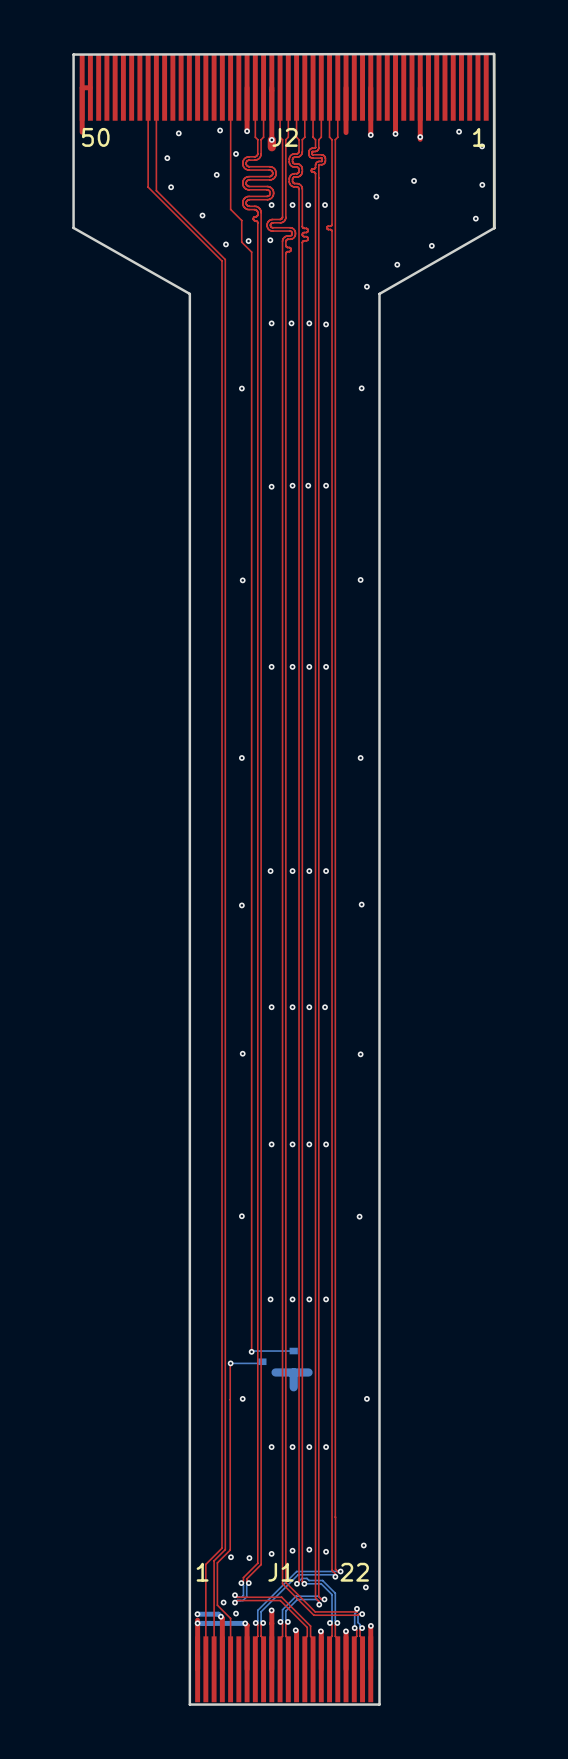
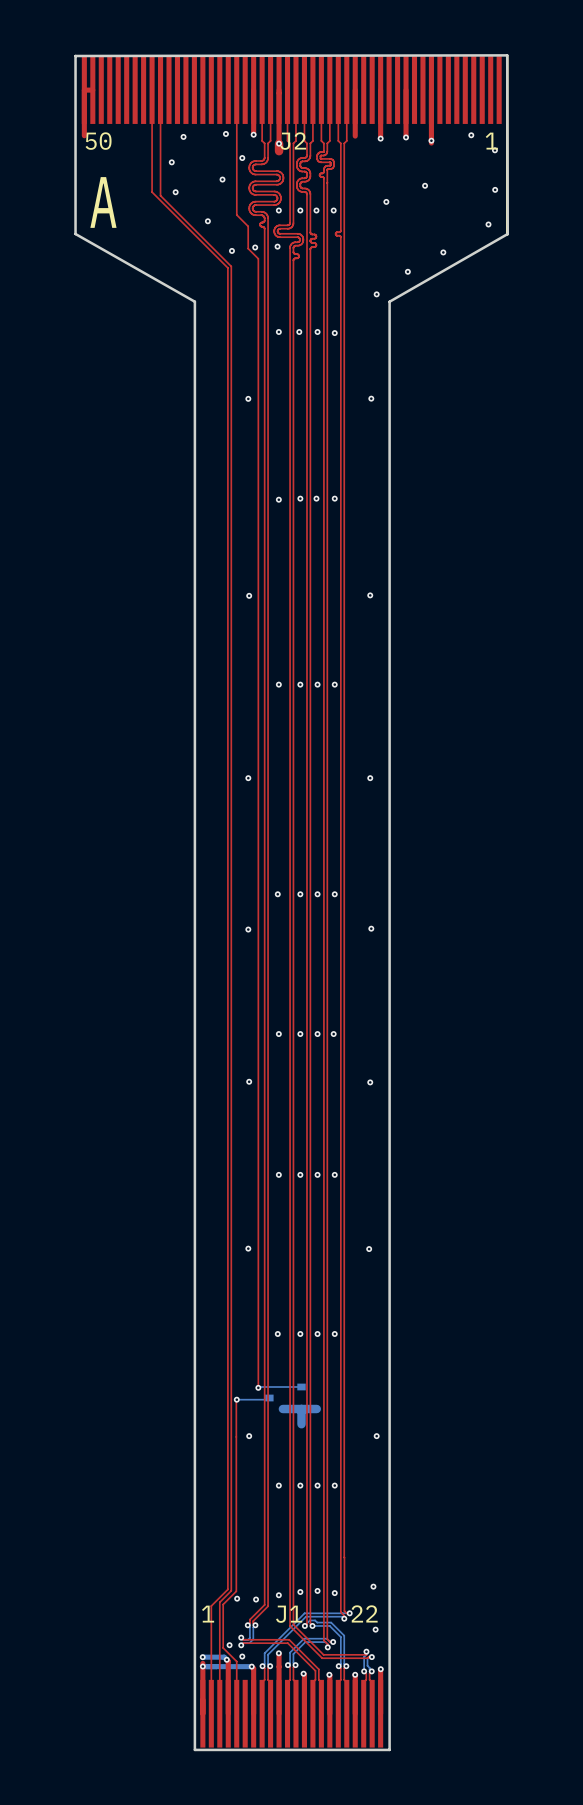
text: none -> A (103, 202)

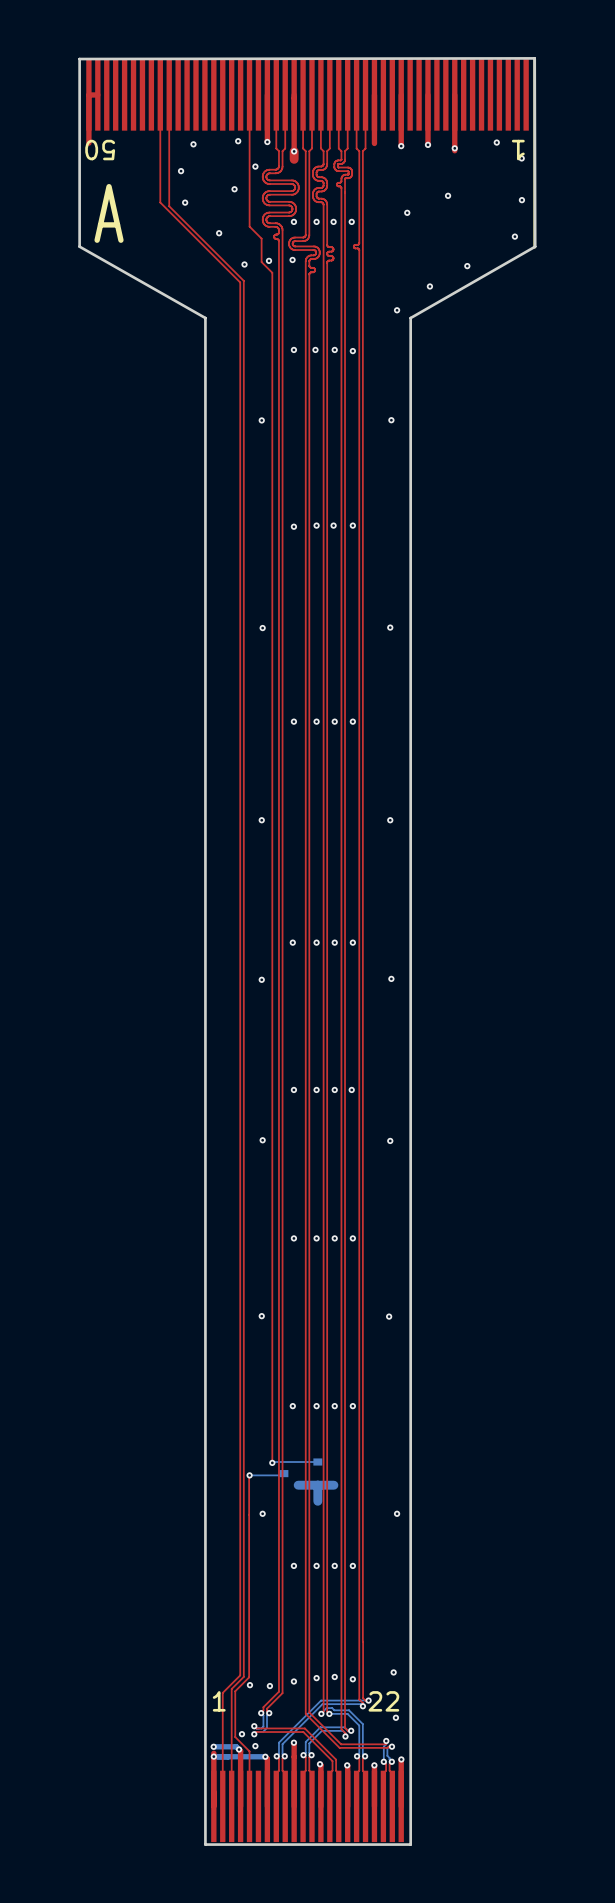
text rotation: 0° (98, 141) -> 180° (100, 150)
J2 name: J2 (293, 141) -> none
text rotation: 0° (491, 141) -> 180° (518, 150)
J1 name: J1 (289, 1614) -> none

